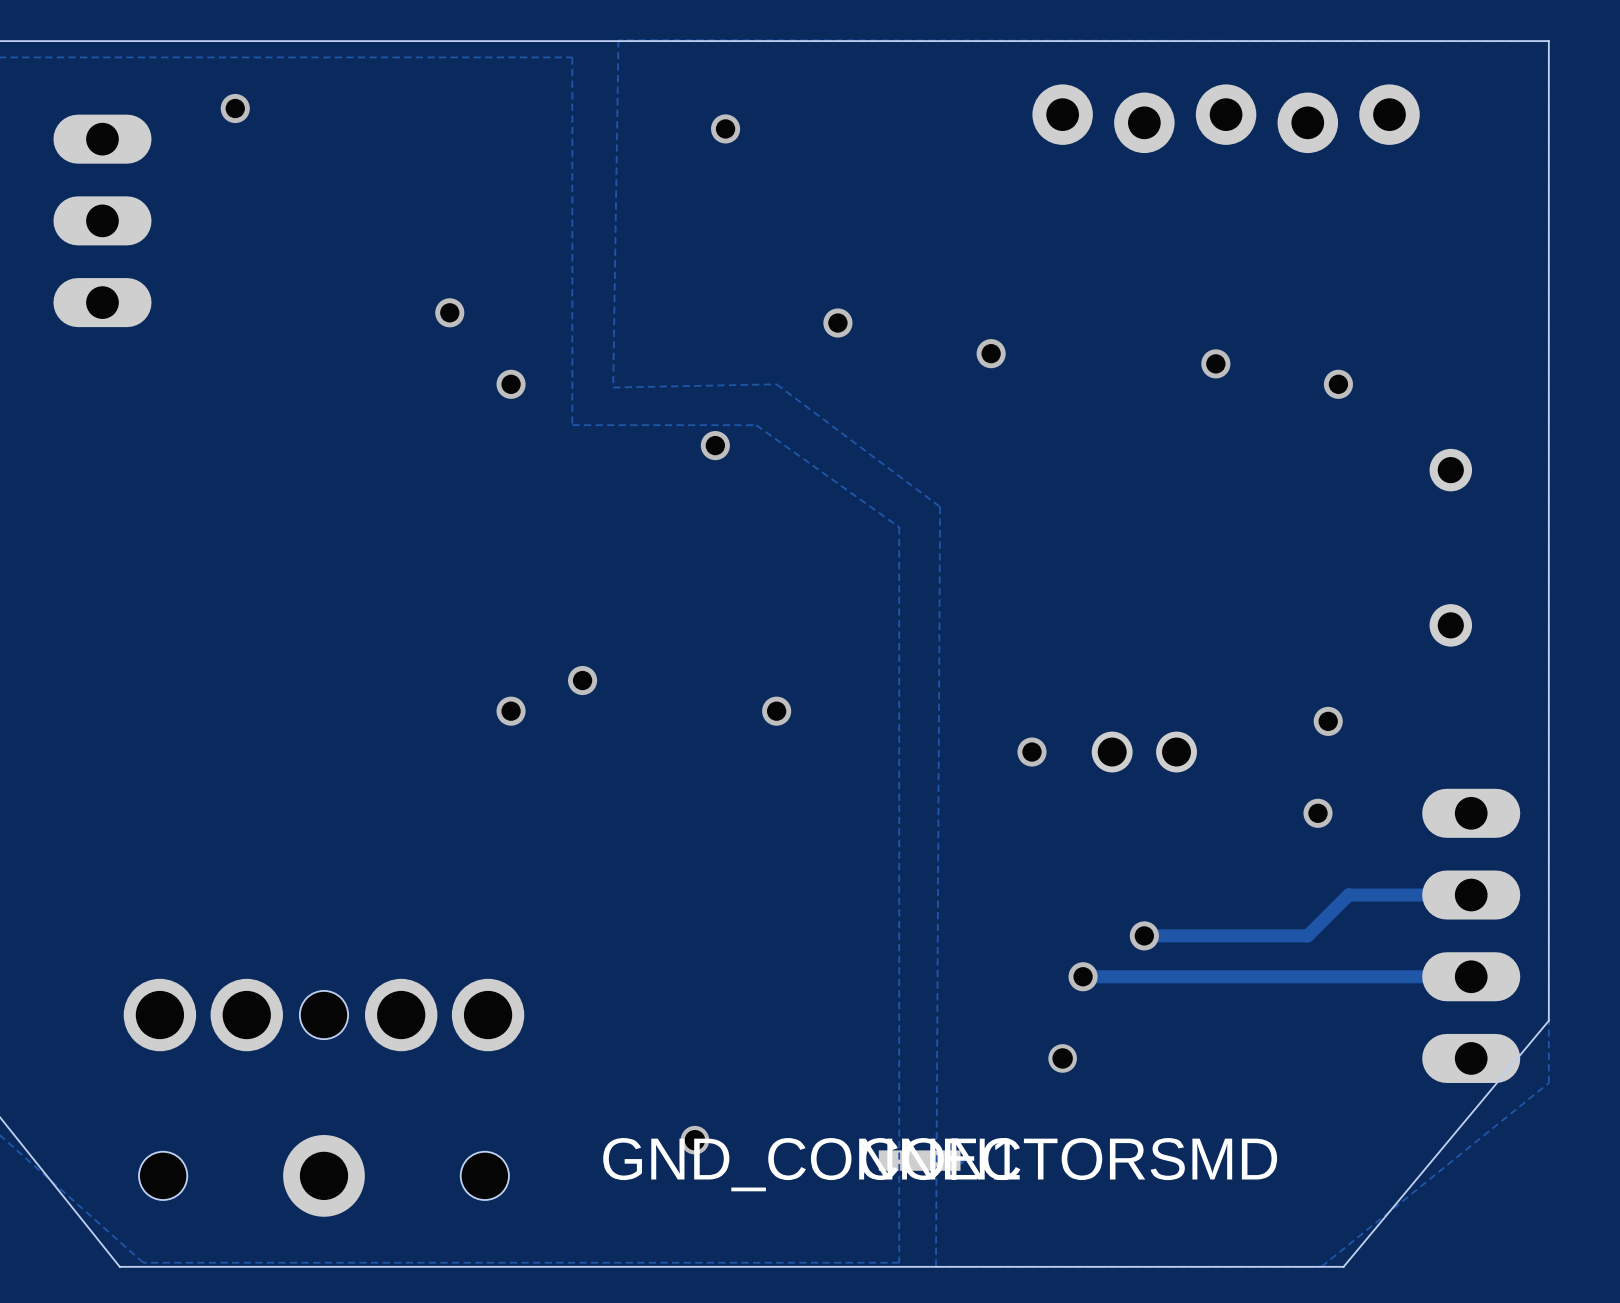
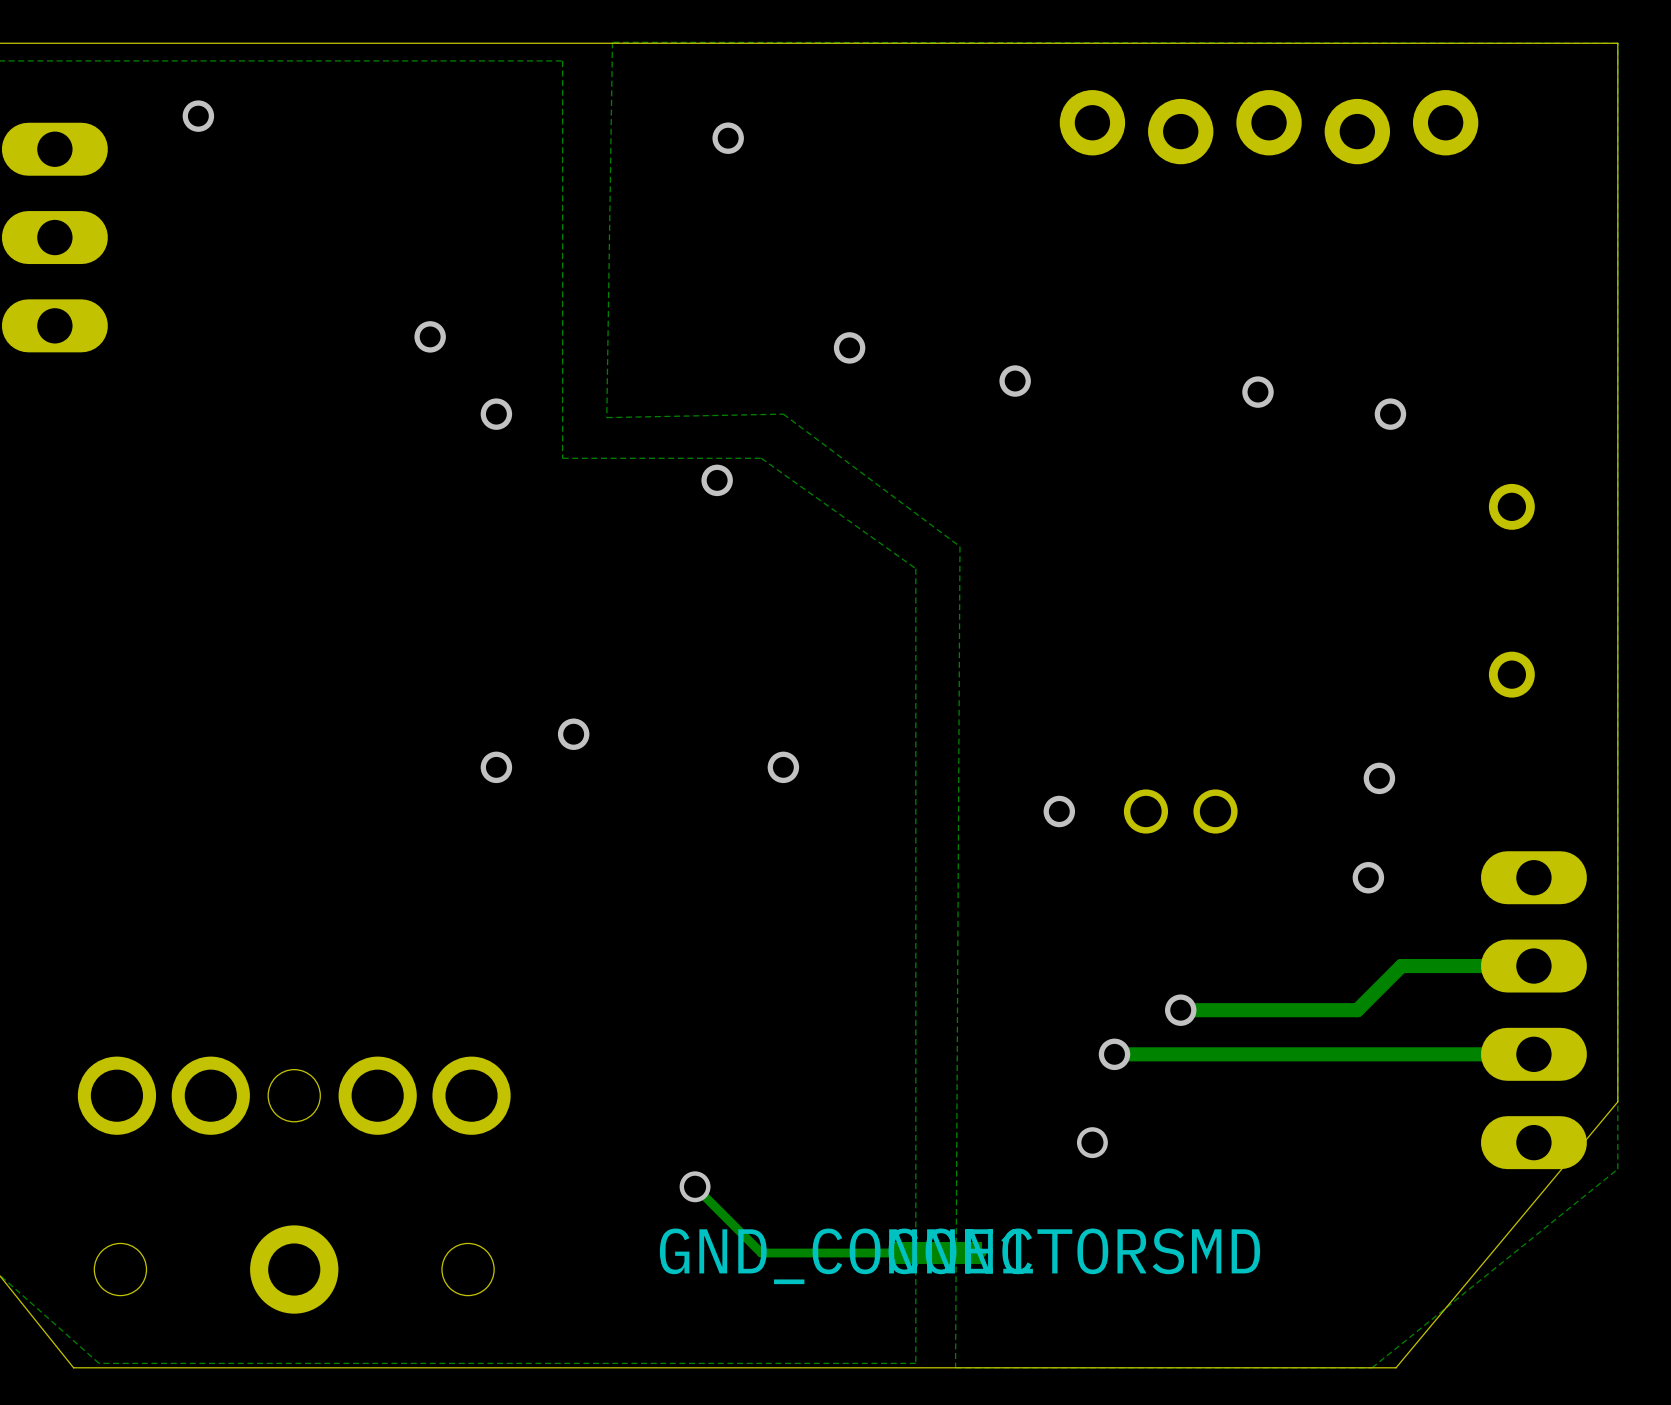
track: none -> (695, 1186) (761, 1253) (915, 1253)
via position: (694, 1140) -> (695, 1186)

